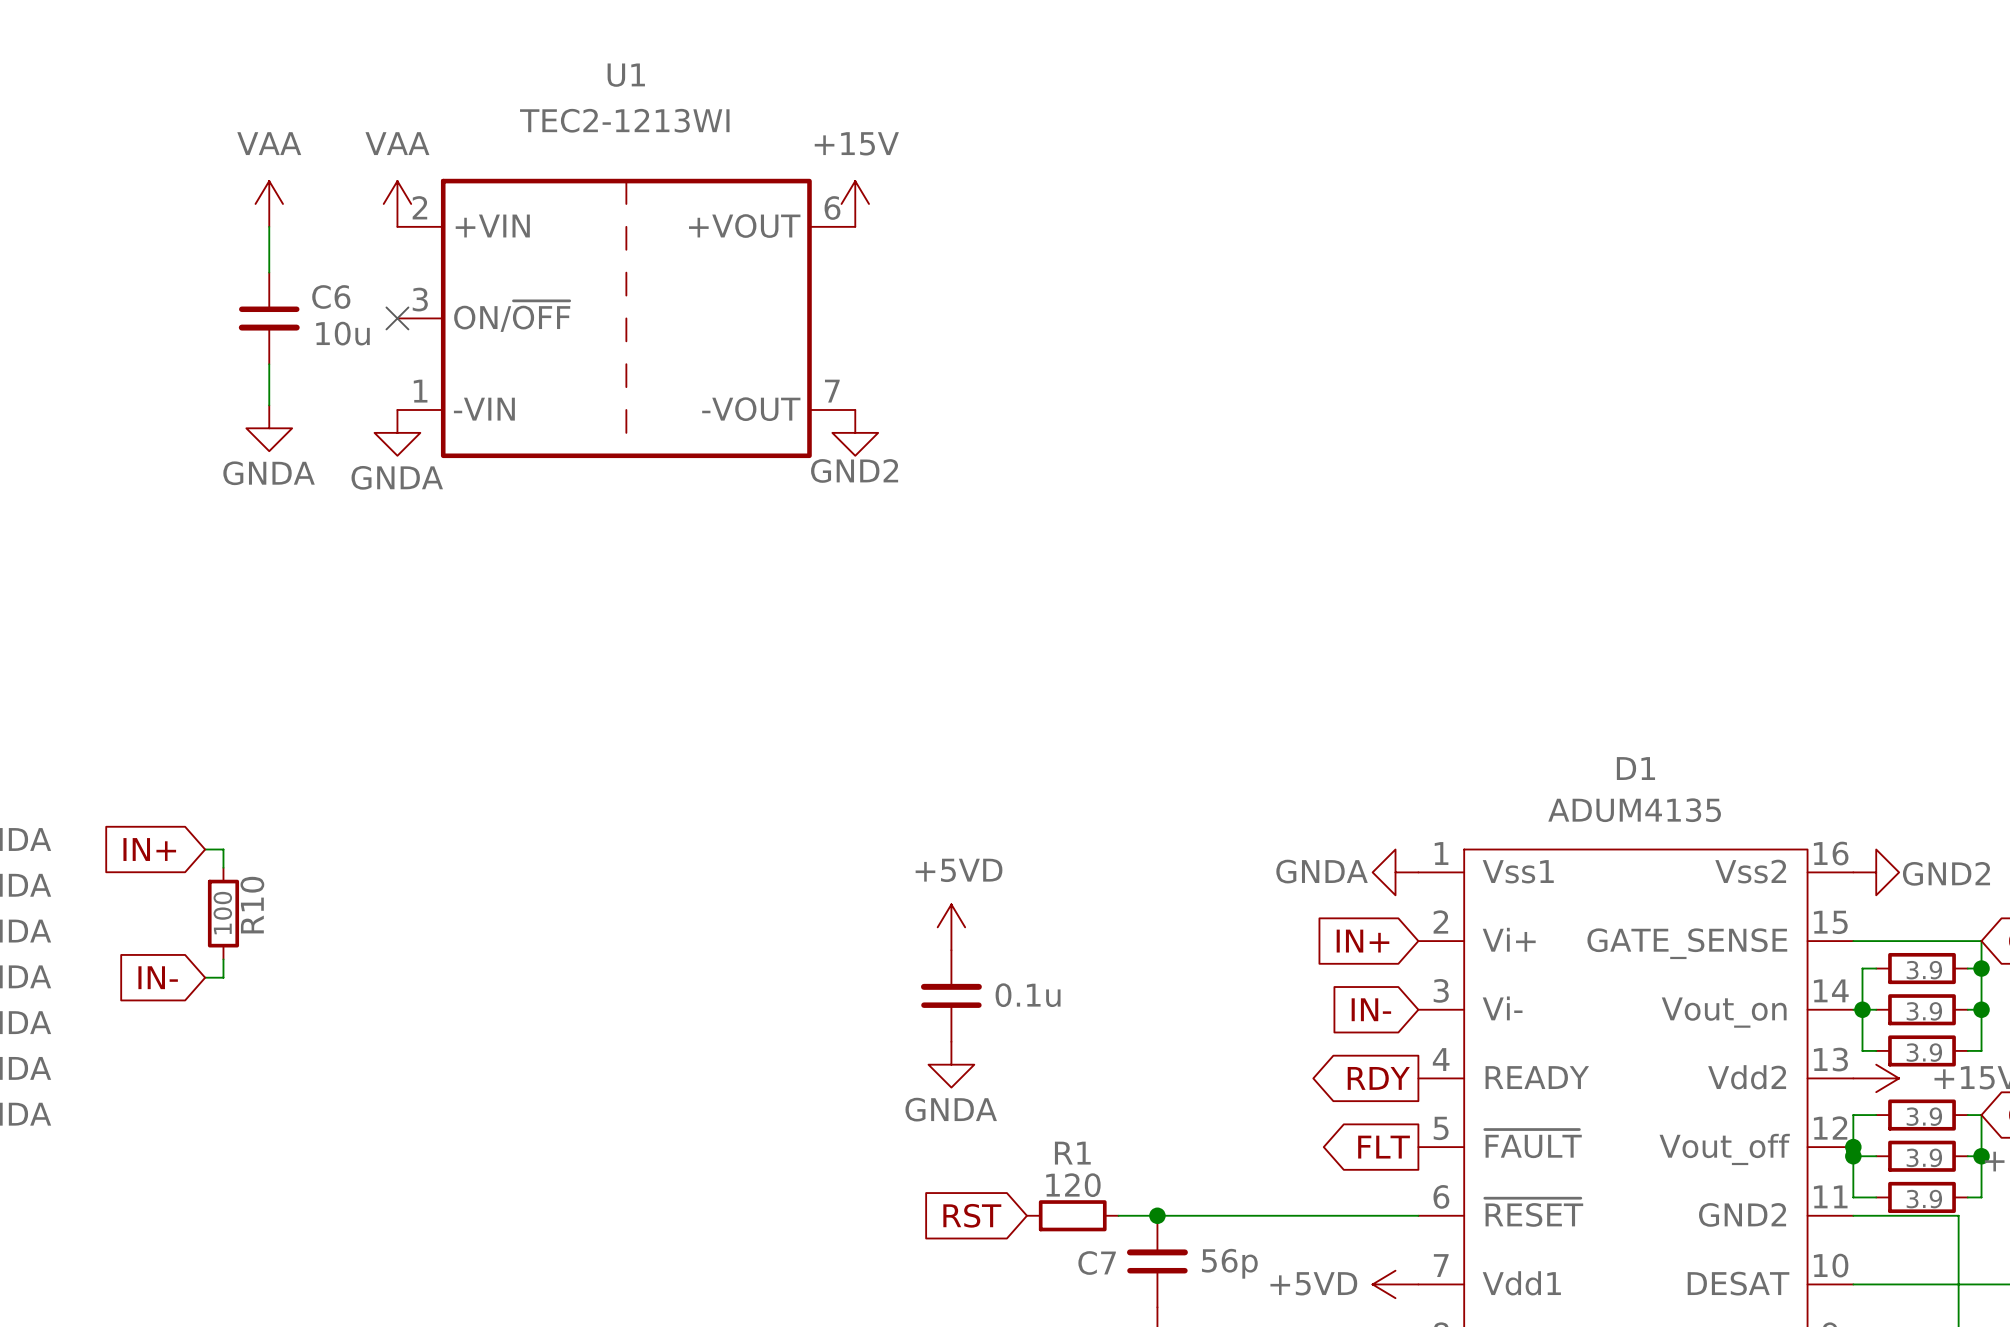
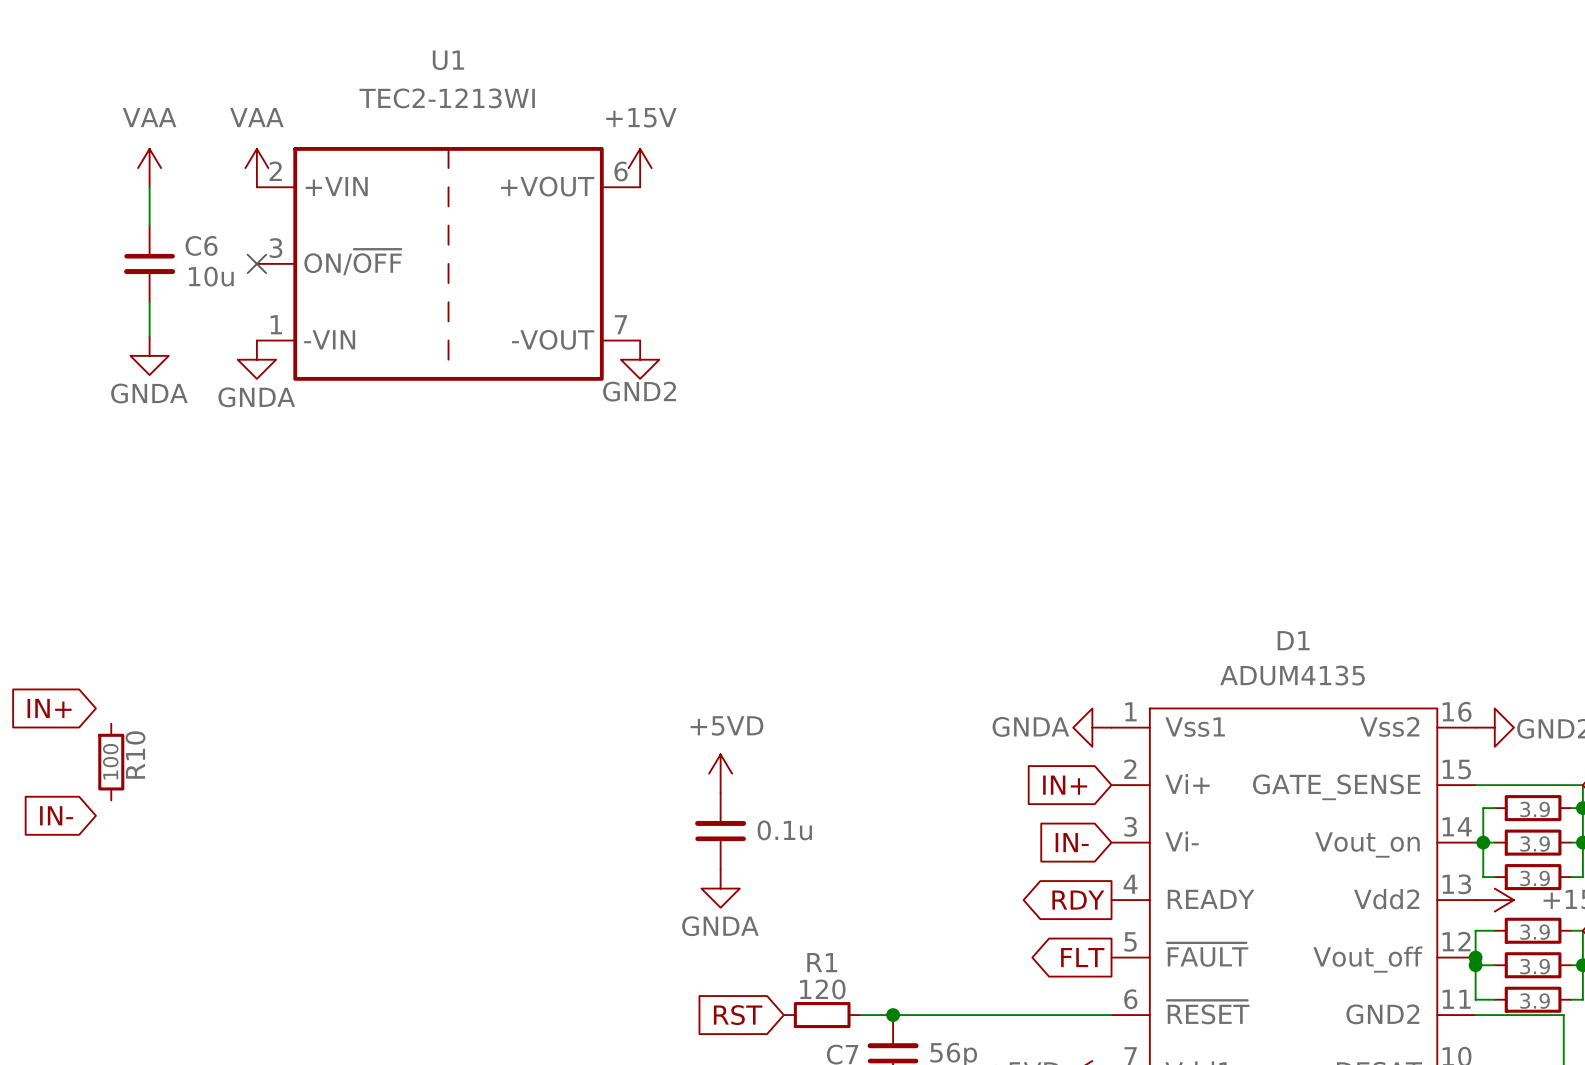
wire: (205, 849) (223, 849) (223, 867) -> none
wire: (223, 959) (223, 977) (205, 977) -> none

